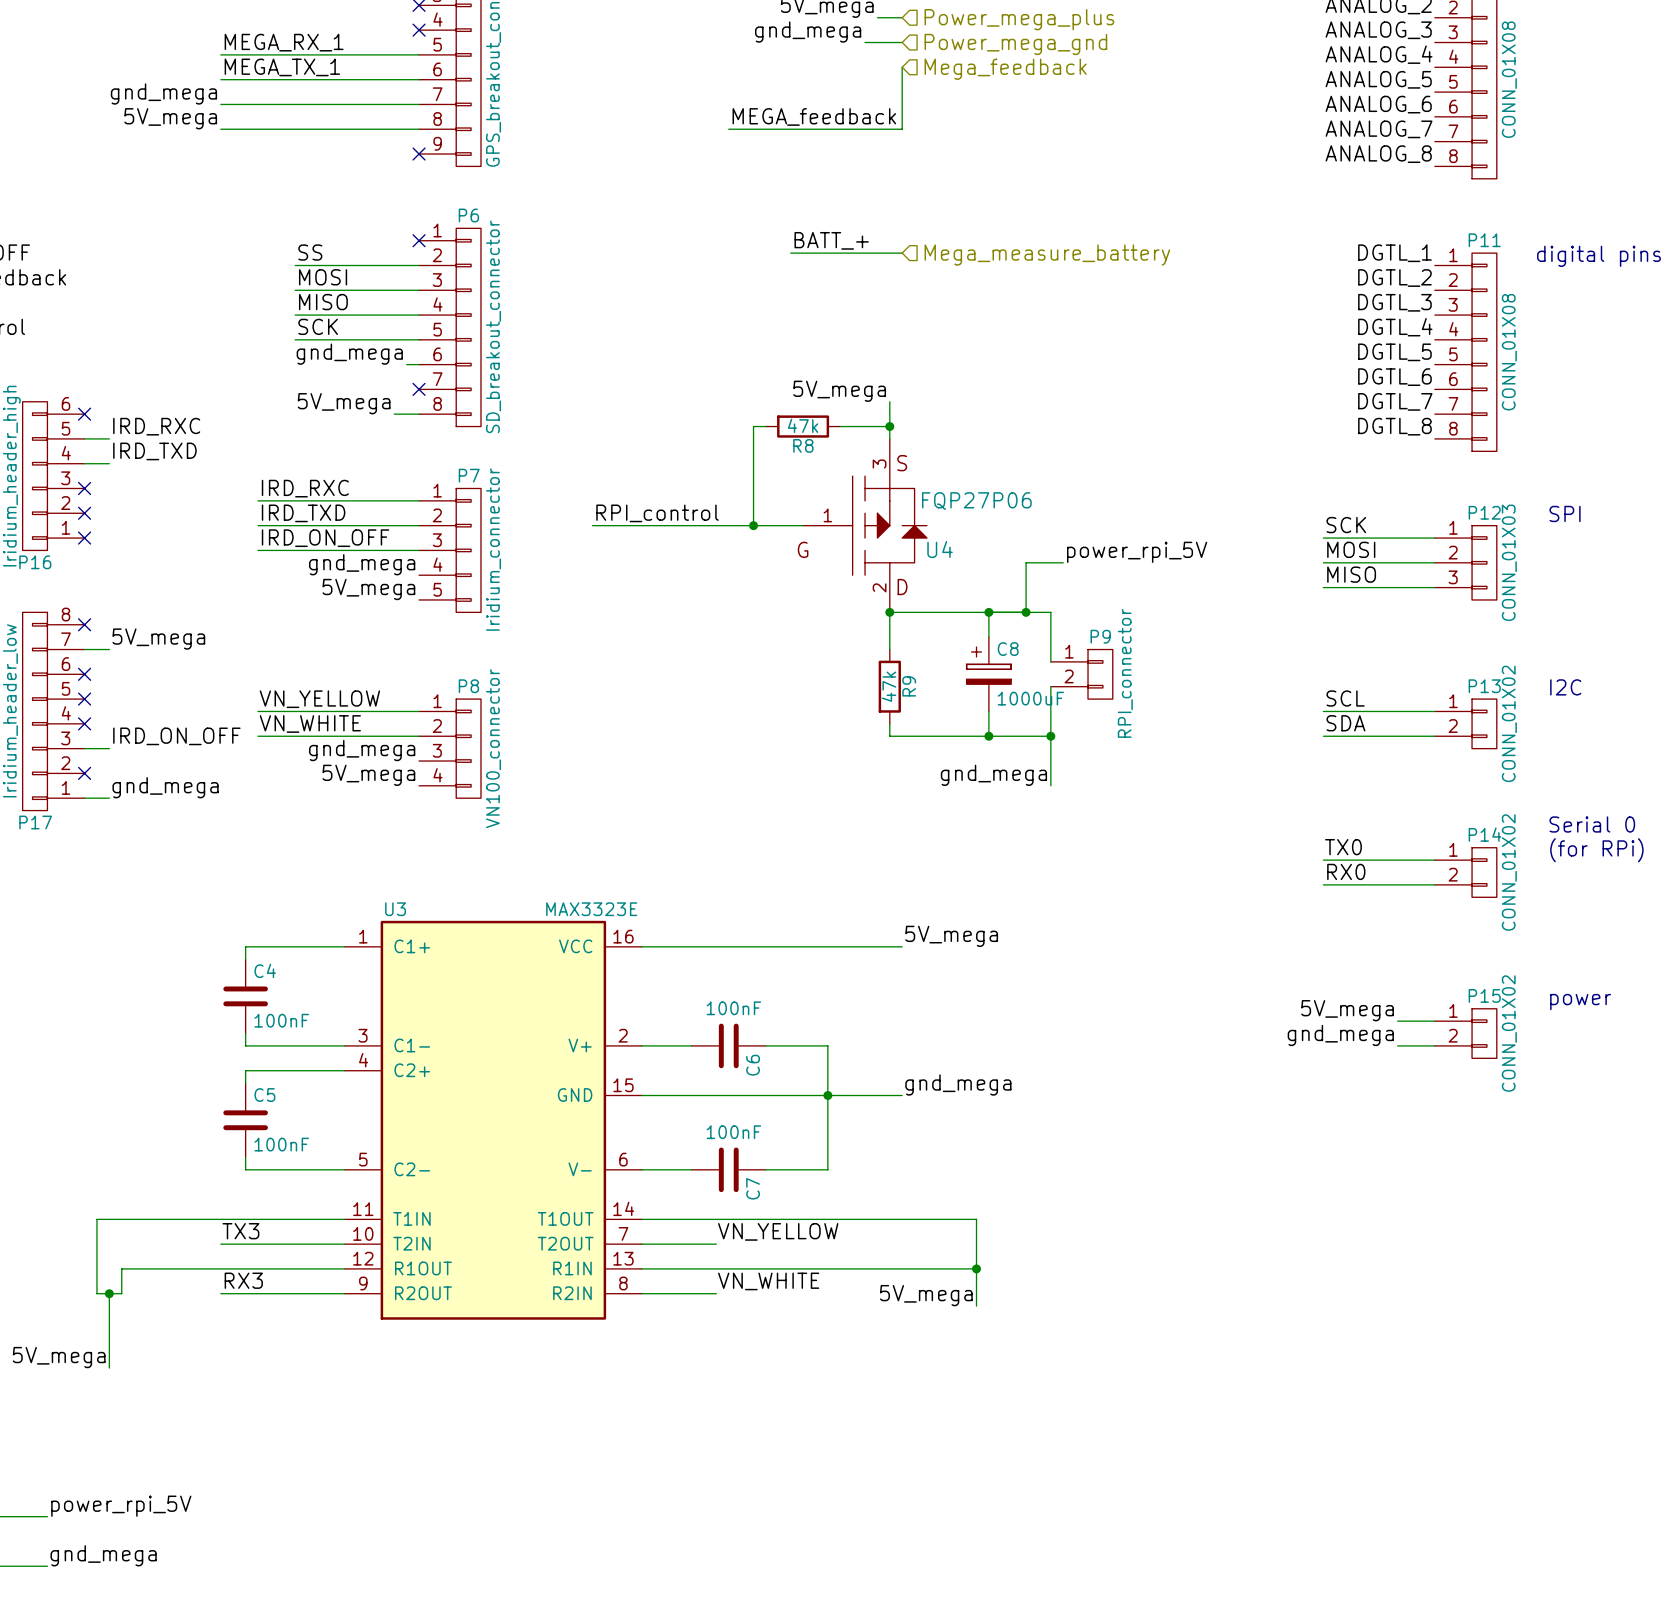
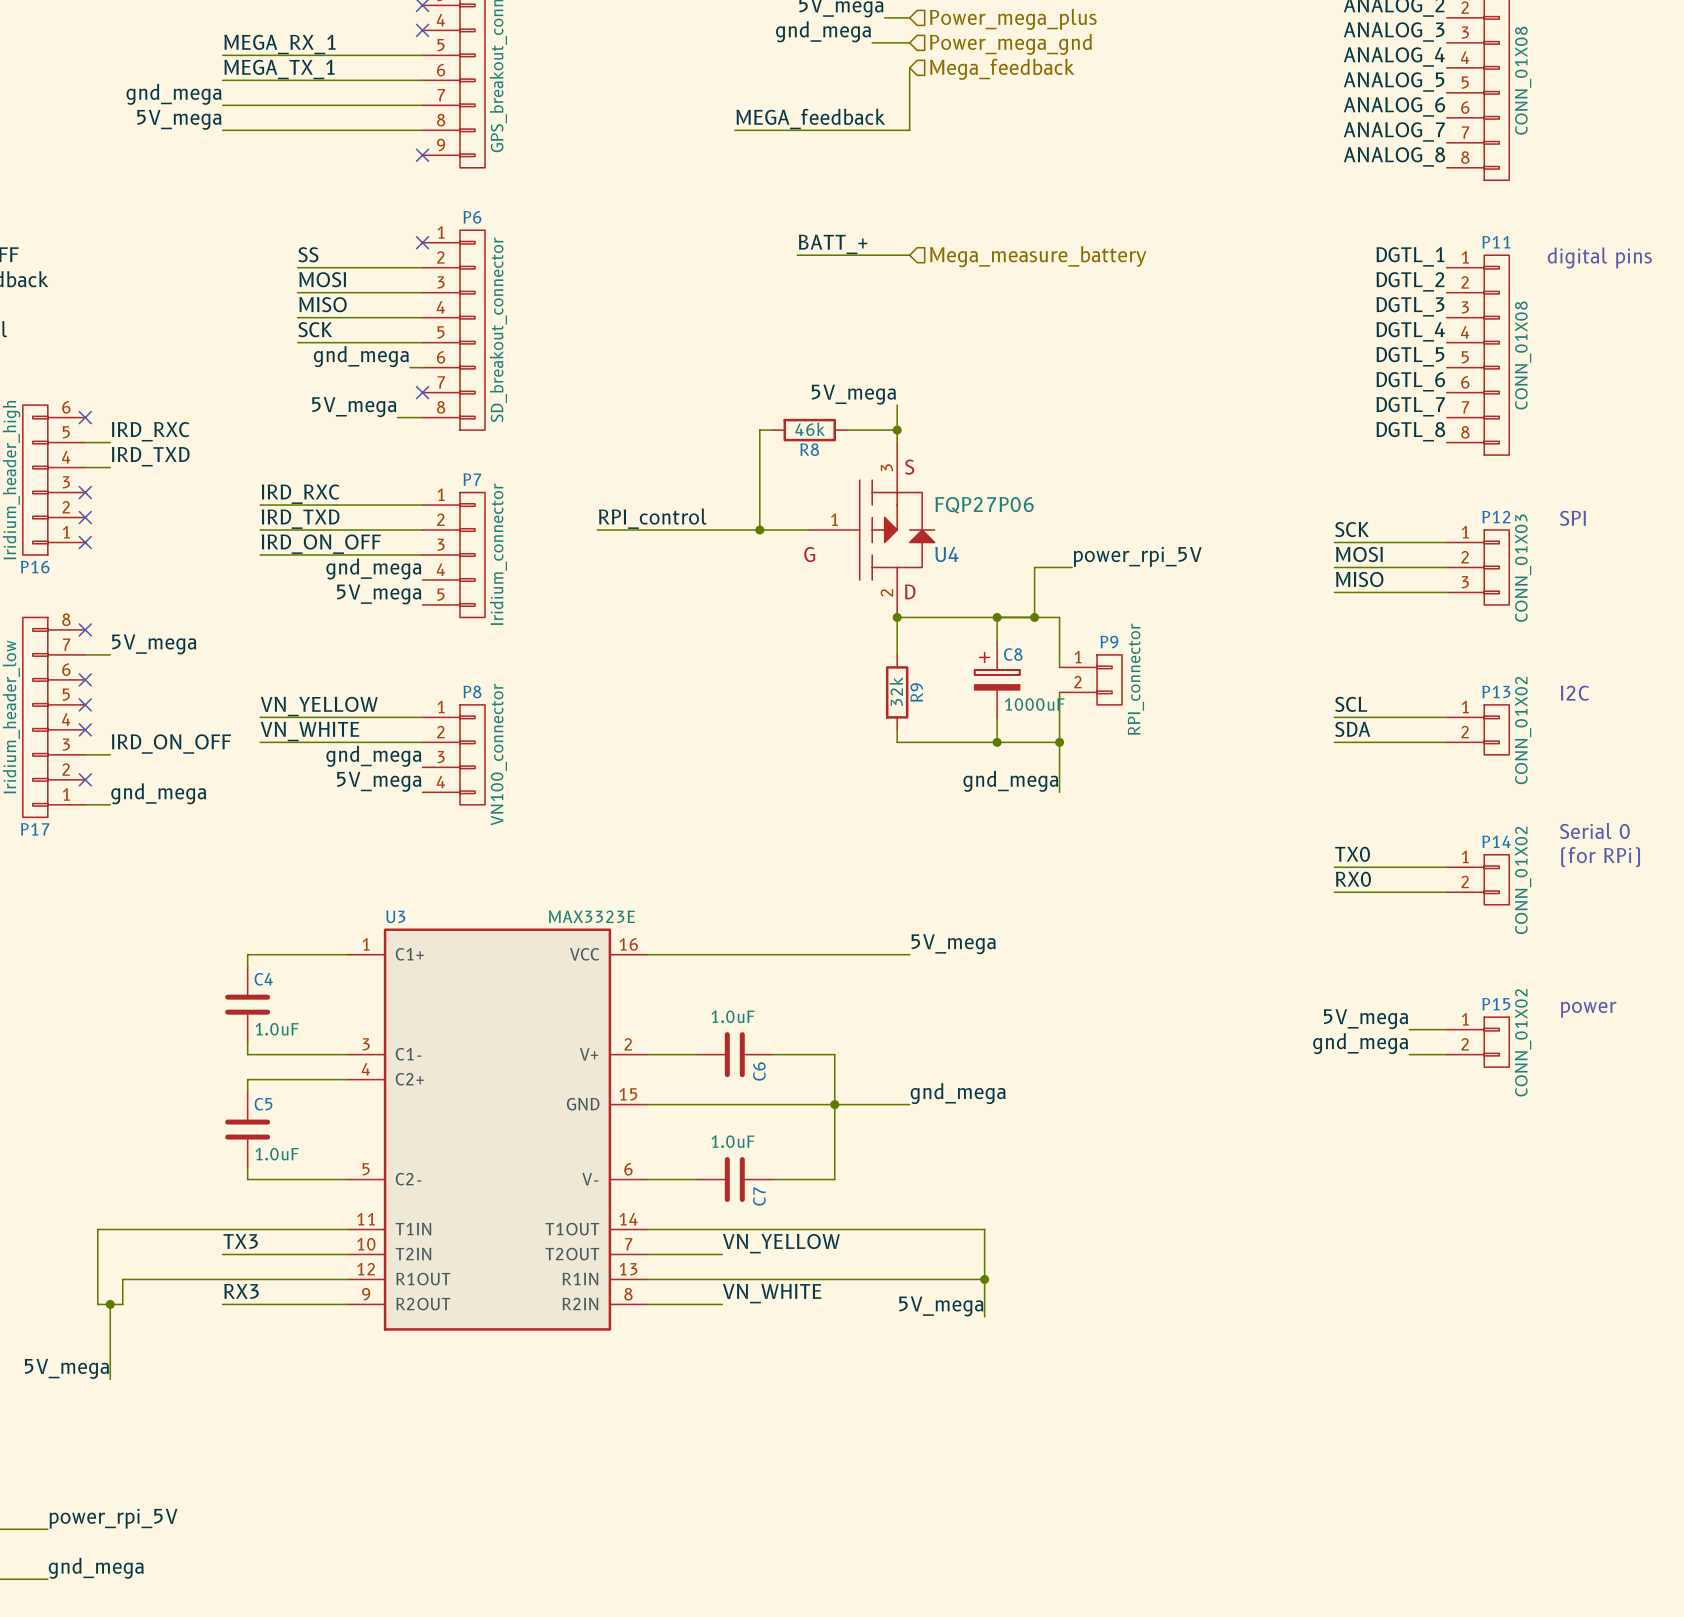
R8 value: 47k (803, 425) -> 46k (810, 429)
R9 value: 47k (889, 686) -> 32k (896, 691)
C6 value: 100nF (733, 1008) -> 1.0uF (733, 1016)
C4 value: 100nF (281, 1020) -> 1.0uF (277, 1029)
C7 value: 100nF (733, 1132) -> 1.0uF (733, 1141)
C5 value: 100nF (281, 1144) -> 1.0uF (277, 1154)

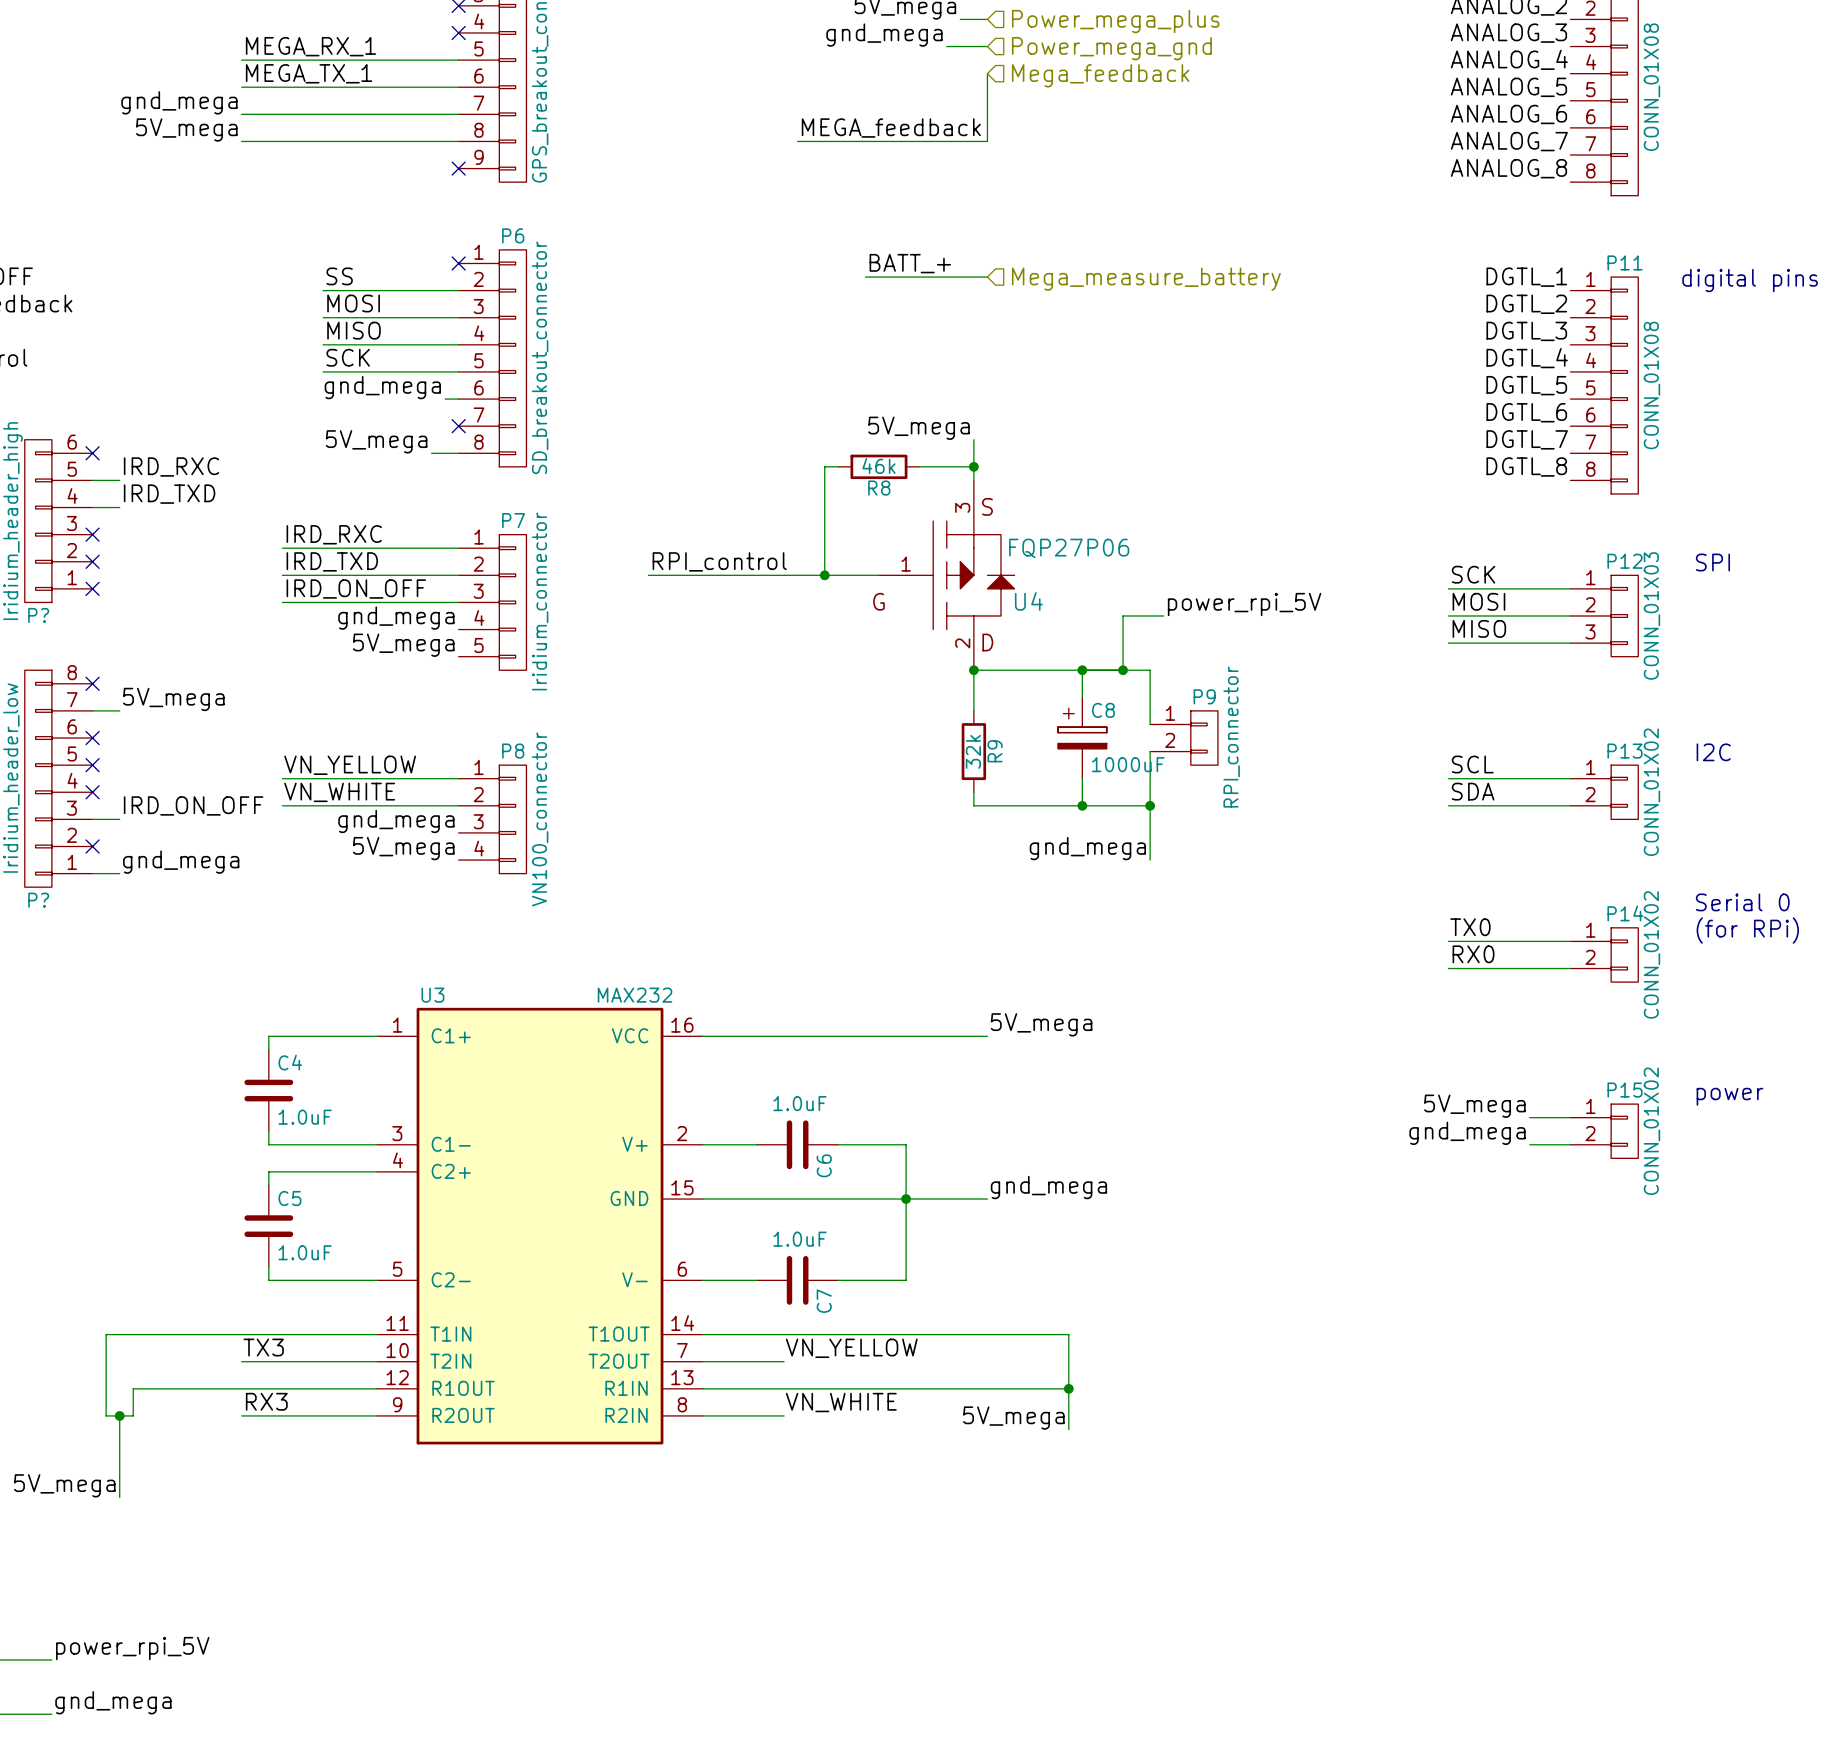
P16 name: P16 (35, 567) -> P? (38, 615)
P17 name: P17 (35, 829) -> P? (38, 900)
U3 value: MAX3323E (591, 916) -> MAX232 (635, 995)

